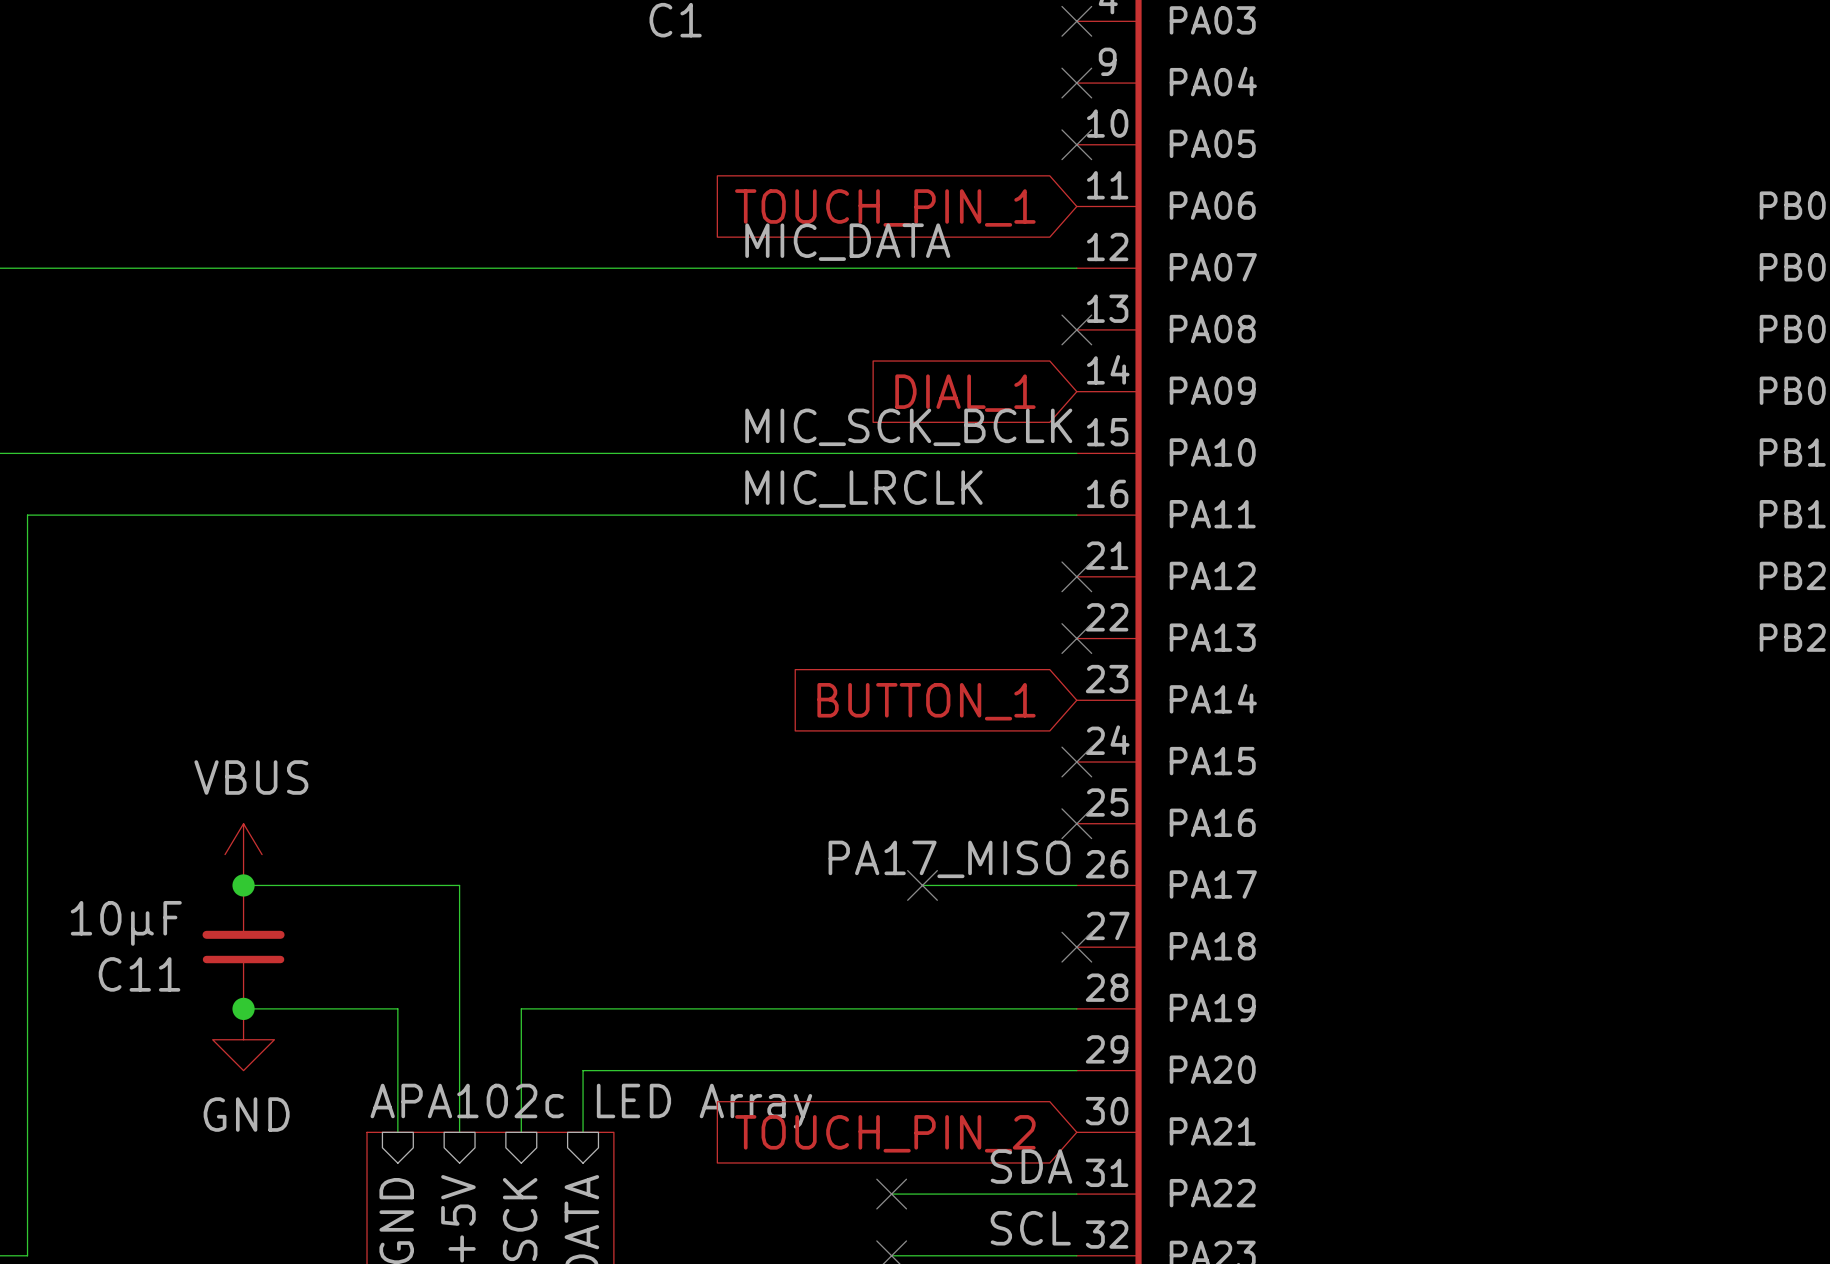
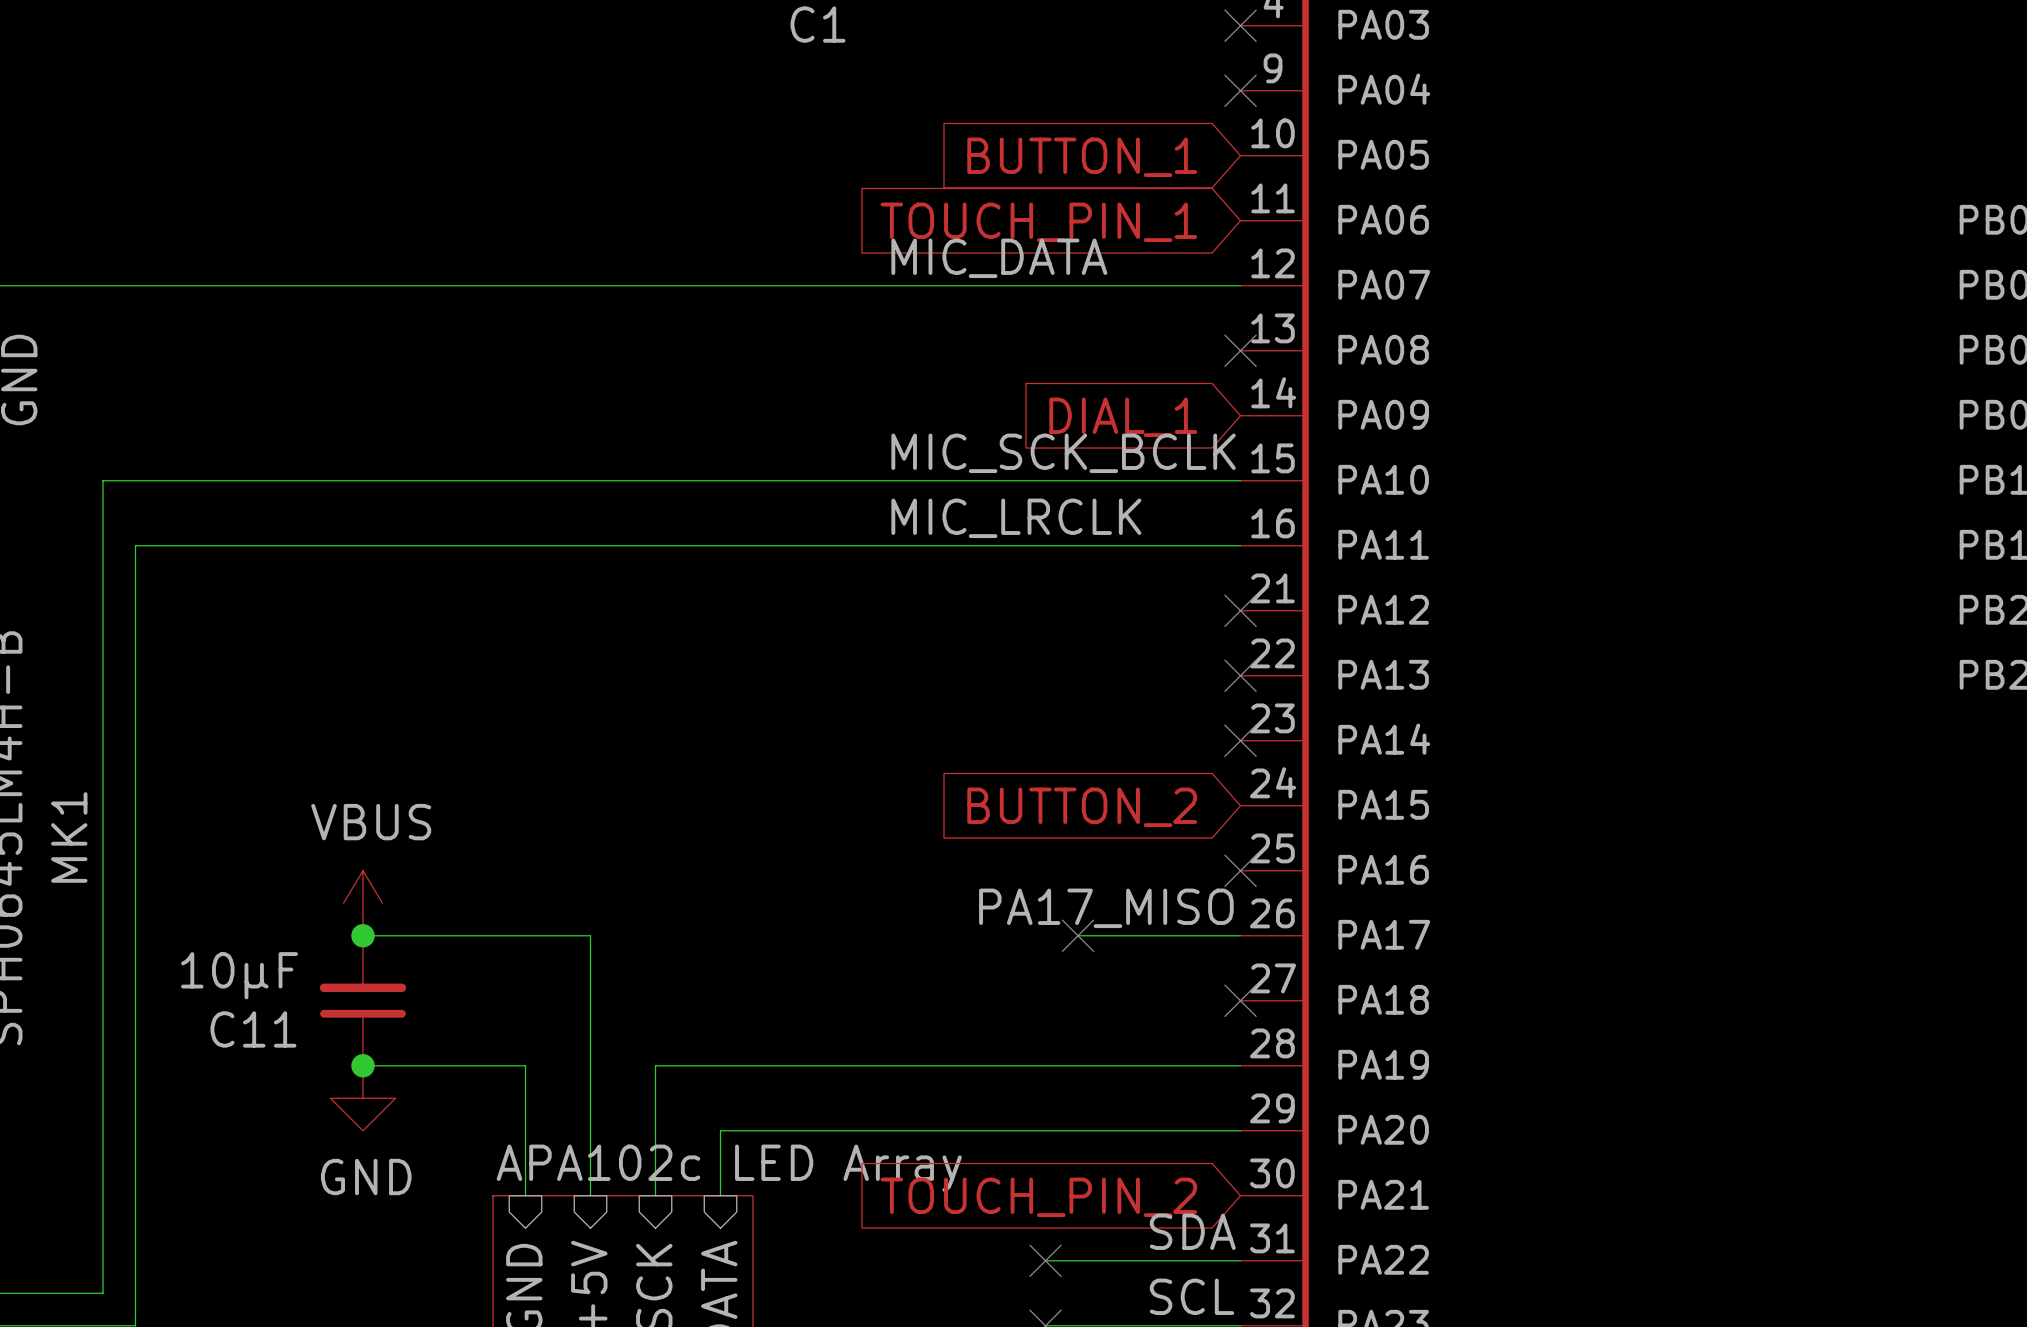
no-connect mark: (1076, 144) -> none
global label position: BUTTON_1 (926, 701) -> BUTTON_1 (1082, 157)
no-connect mark position: (1076, 762) -> (1240, 740)
global label: none -> BUTTON_2 (1082, 807)

